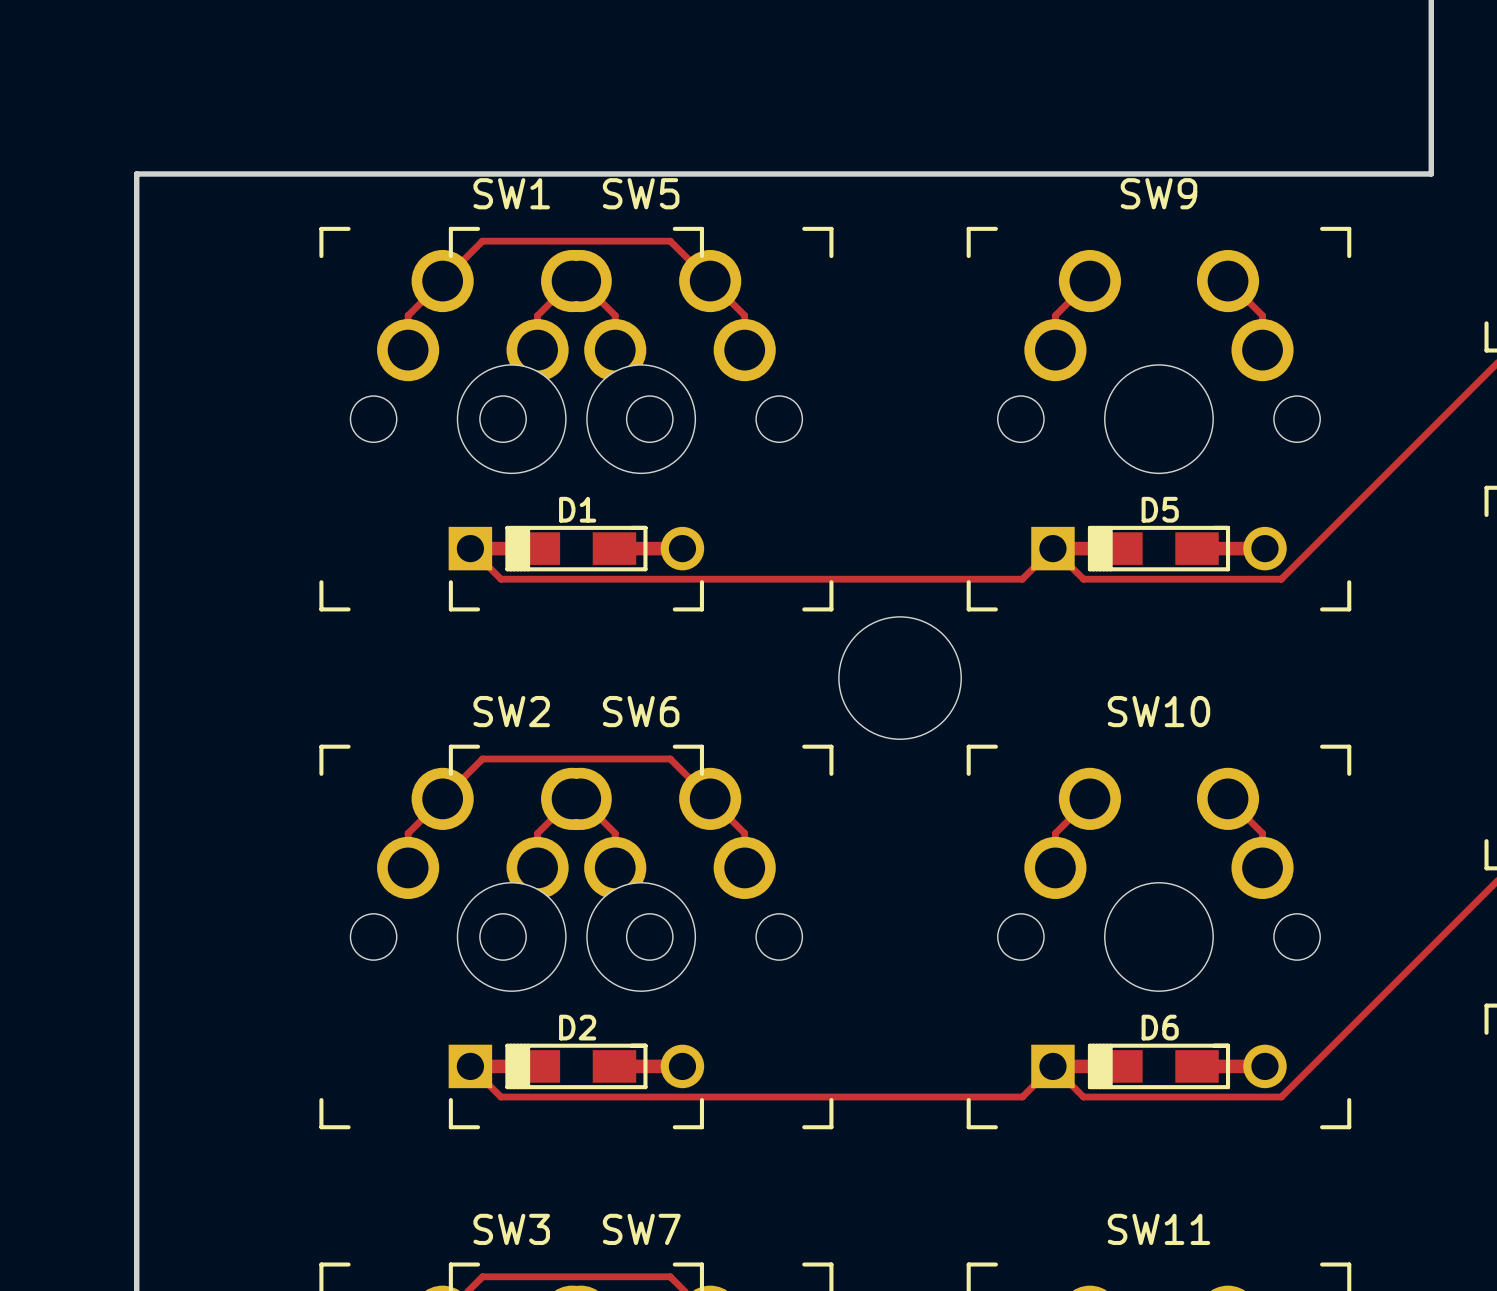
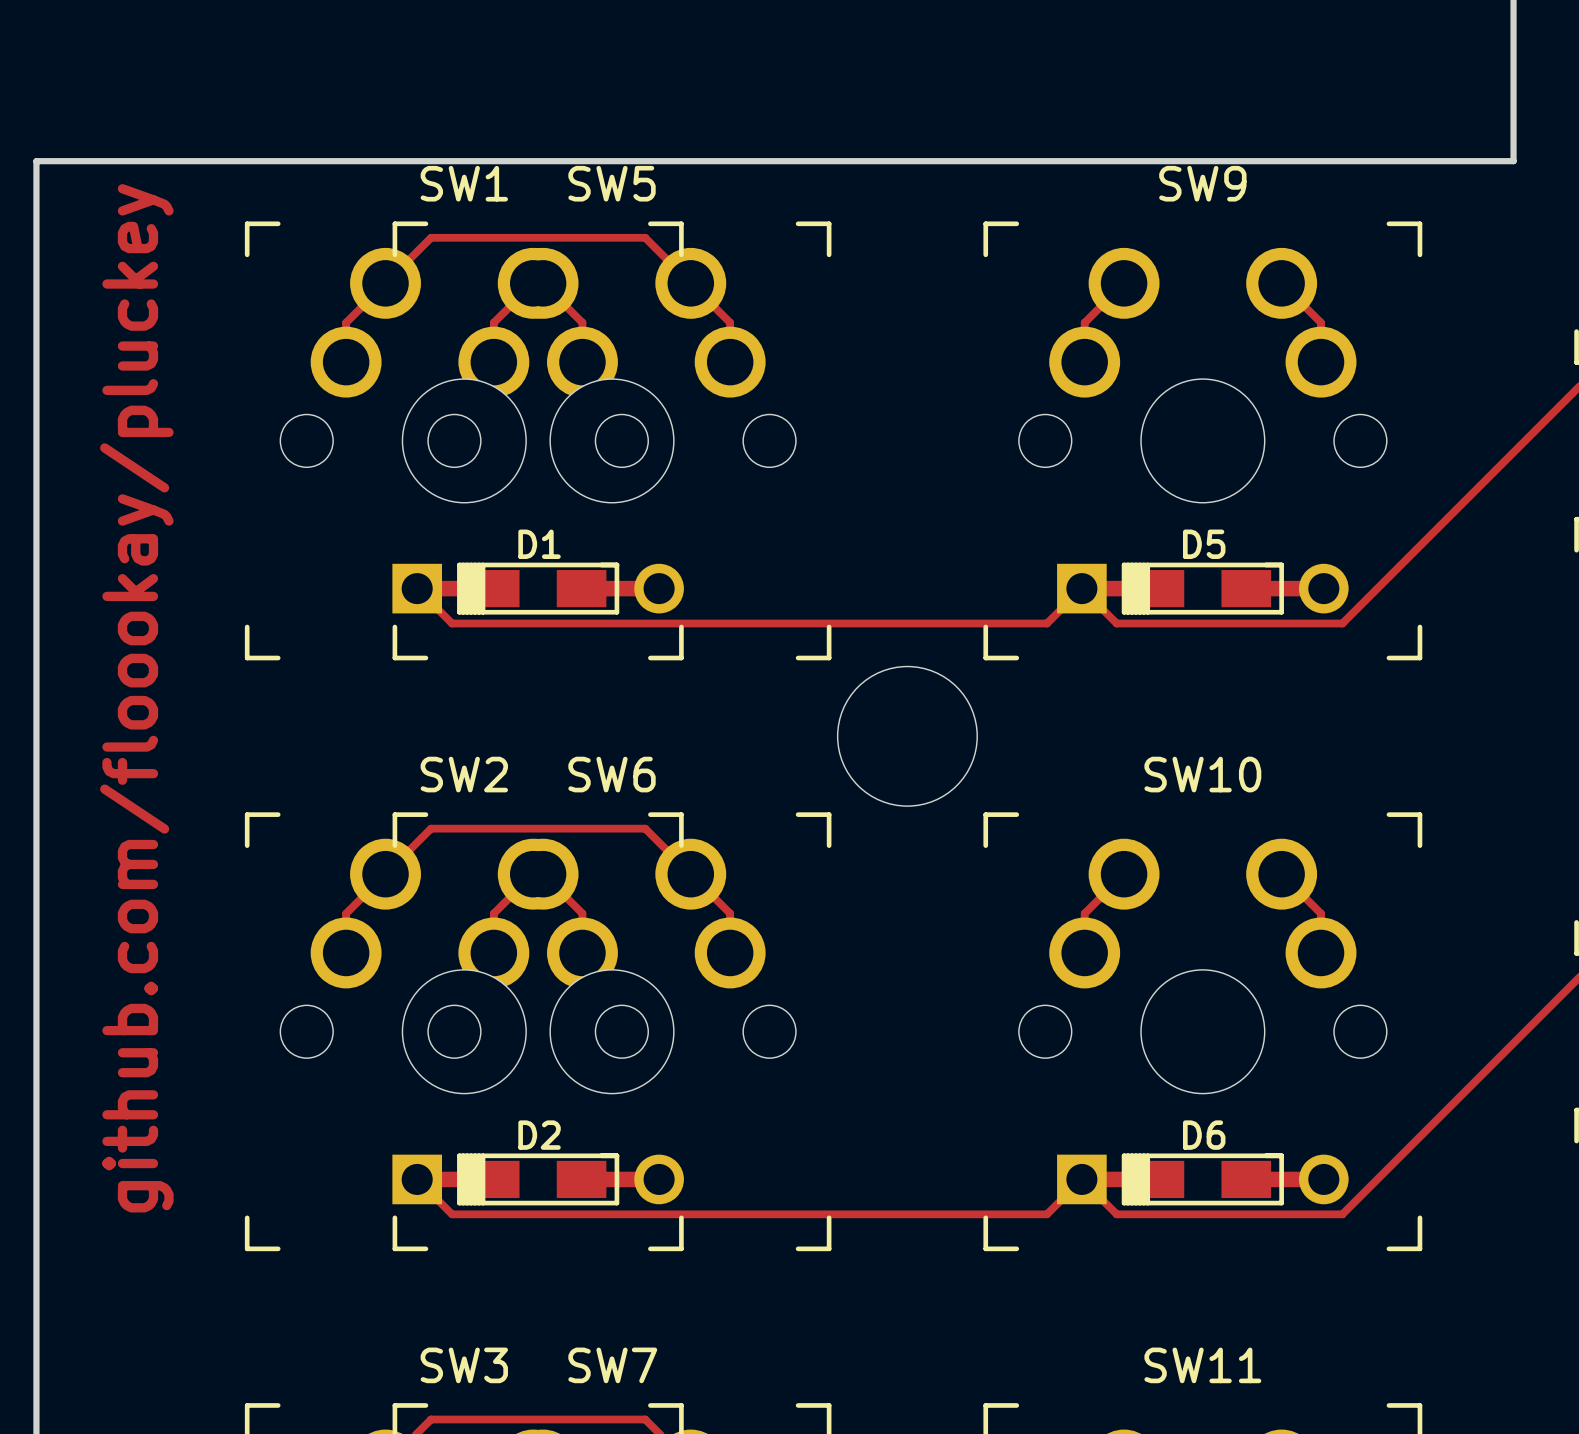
text: none -> github.com/floookay/pluckey (136, 698)

